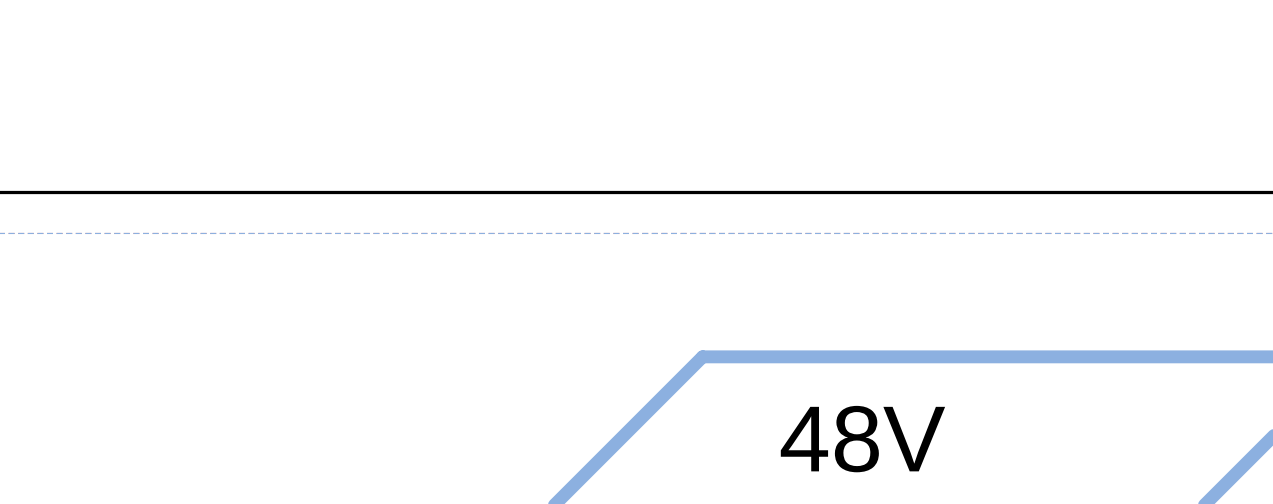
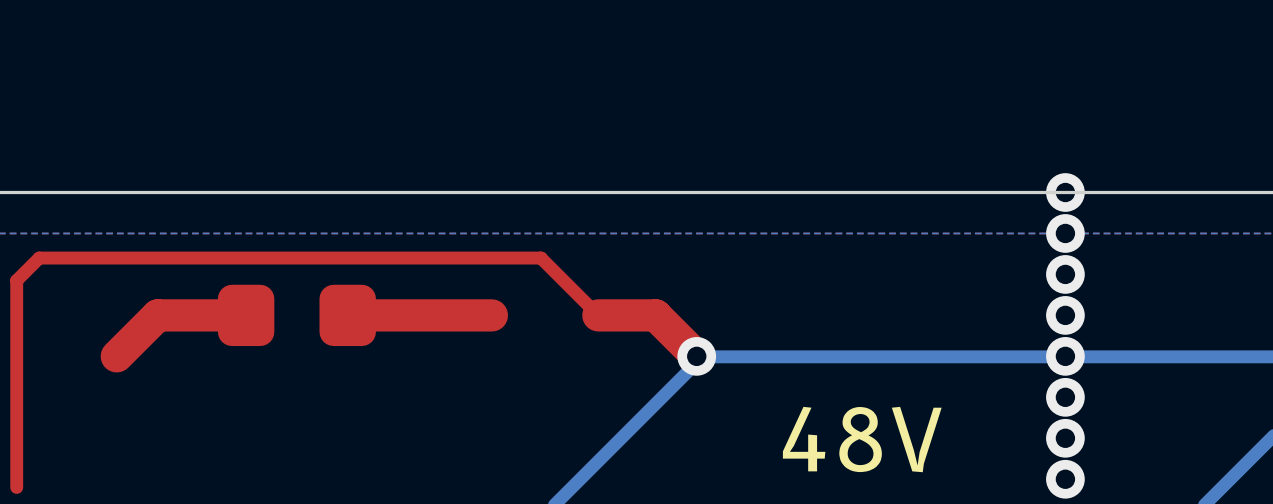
via: none -> (1065, 192)
via: none -> (1065, 233)
via: none -> (1065, 274)
top track: none -> (246, 315) (157, 315) (116, 356)
part: none -> (296, 315)
top track: none -> (491, 315) (347, 315)
via: none -> (1065, 315)
top track: none -> (696, 356) (655, 315) (598, 315) (541, 258) (39, 258) (16, 280) (16, 487)
via: none -> (696, 356)
via: none -> (1065, 356)
via: none -> (1065, 397)
via: none -> (1065, 438)
via: none -> (1065, 479)

